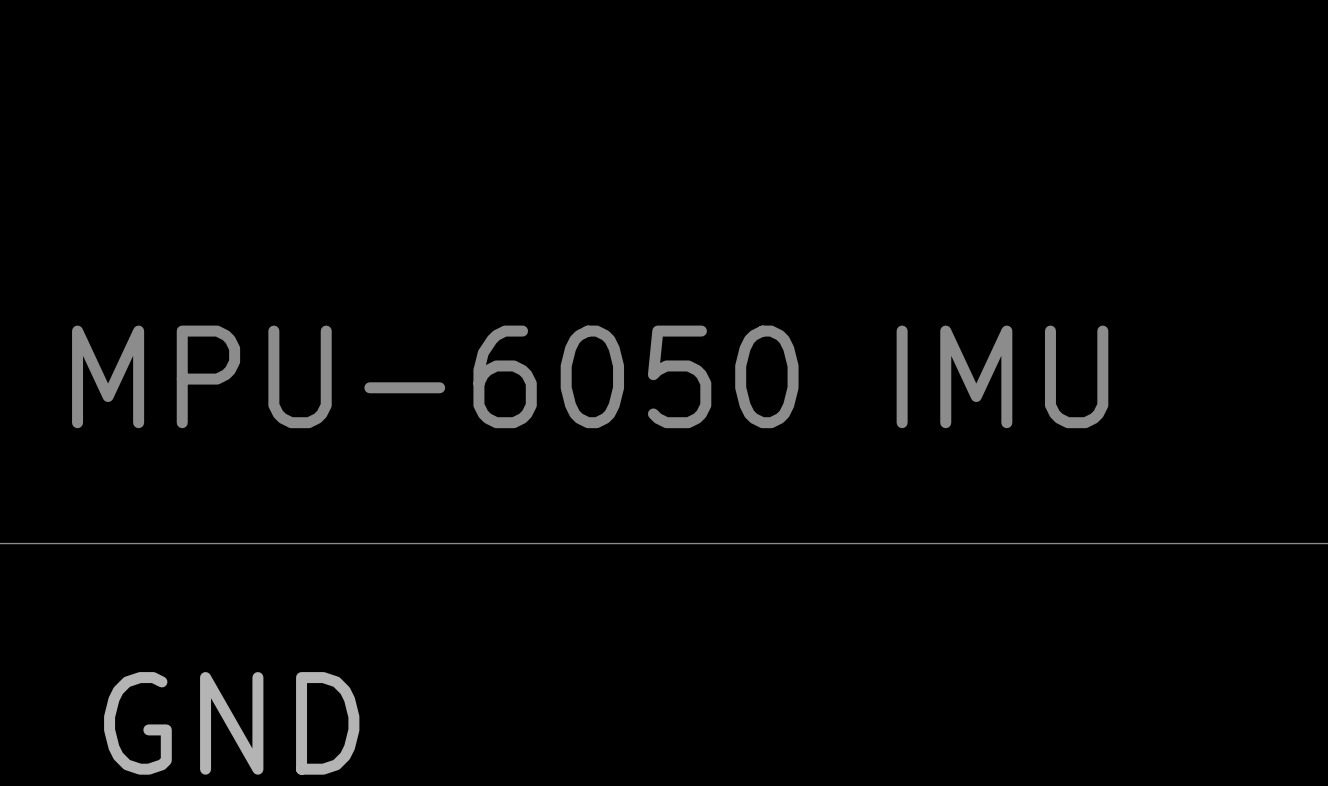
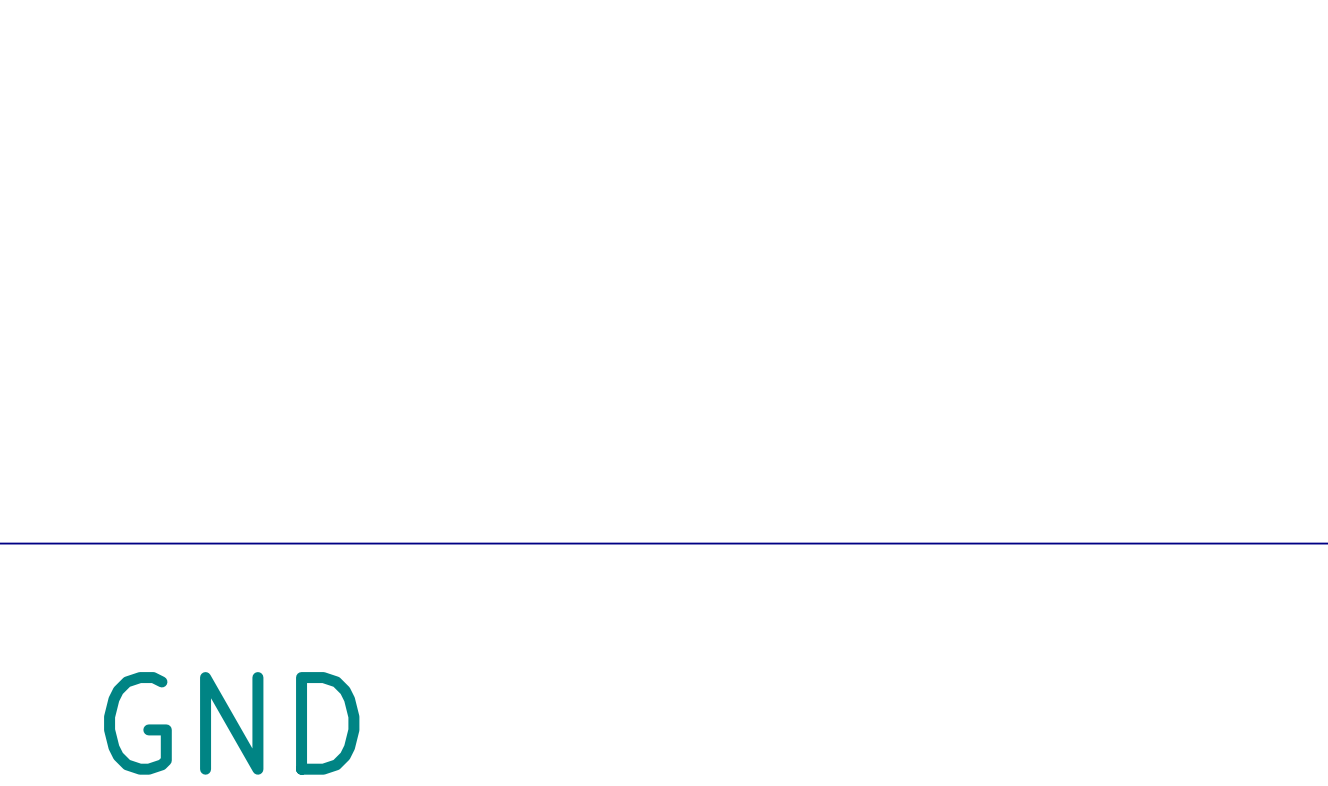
text: MPU-6050 IMU (590, 376) -> none

